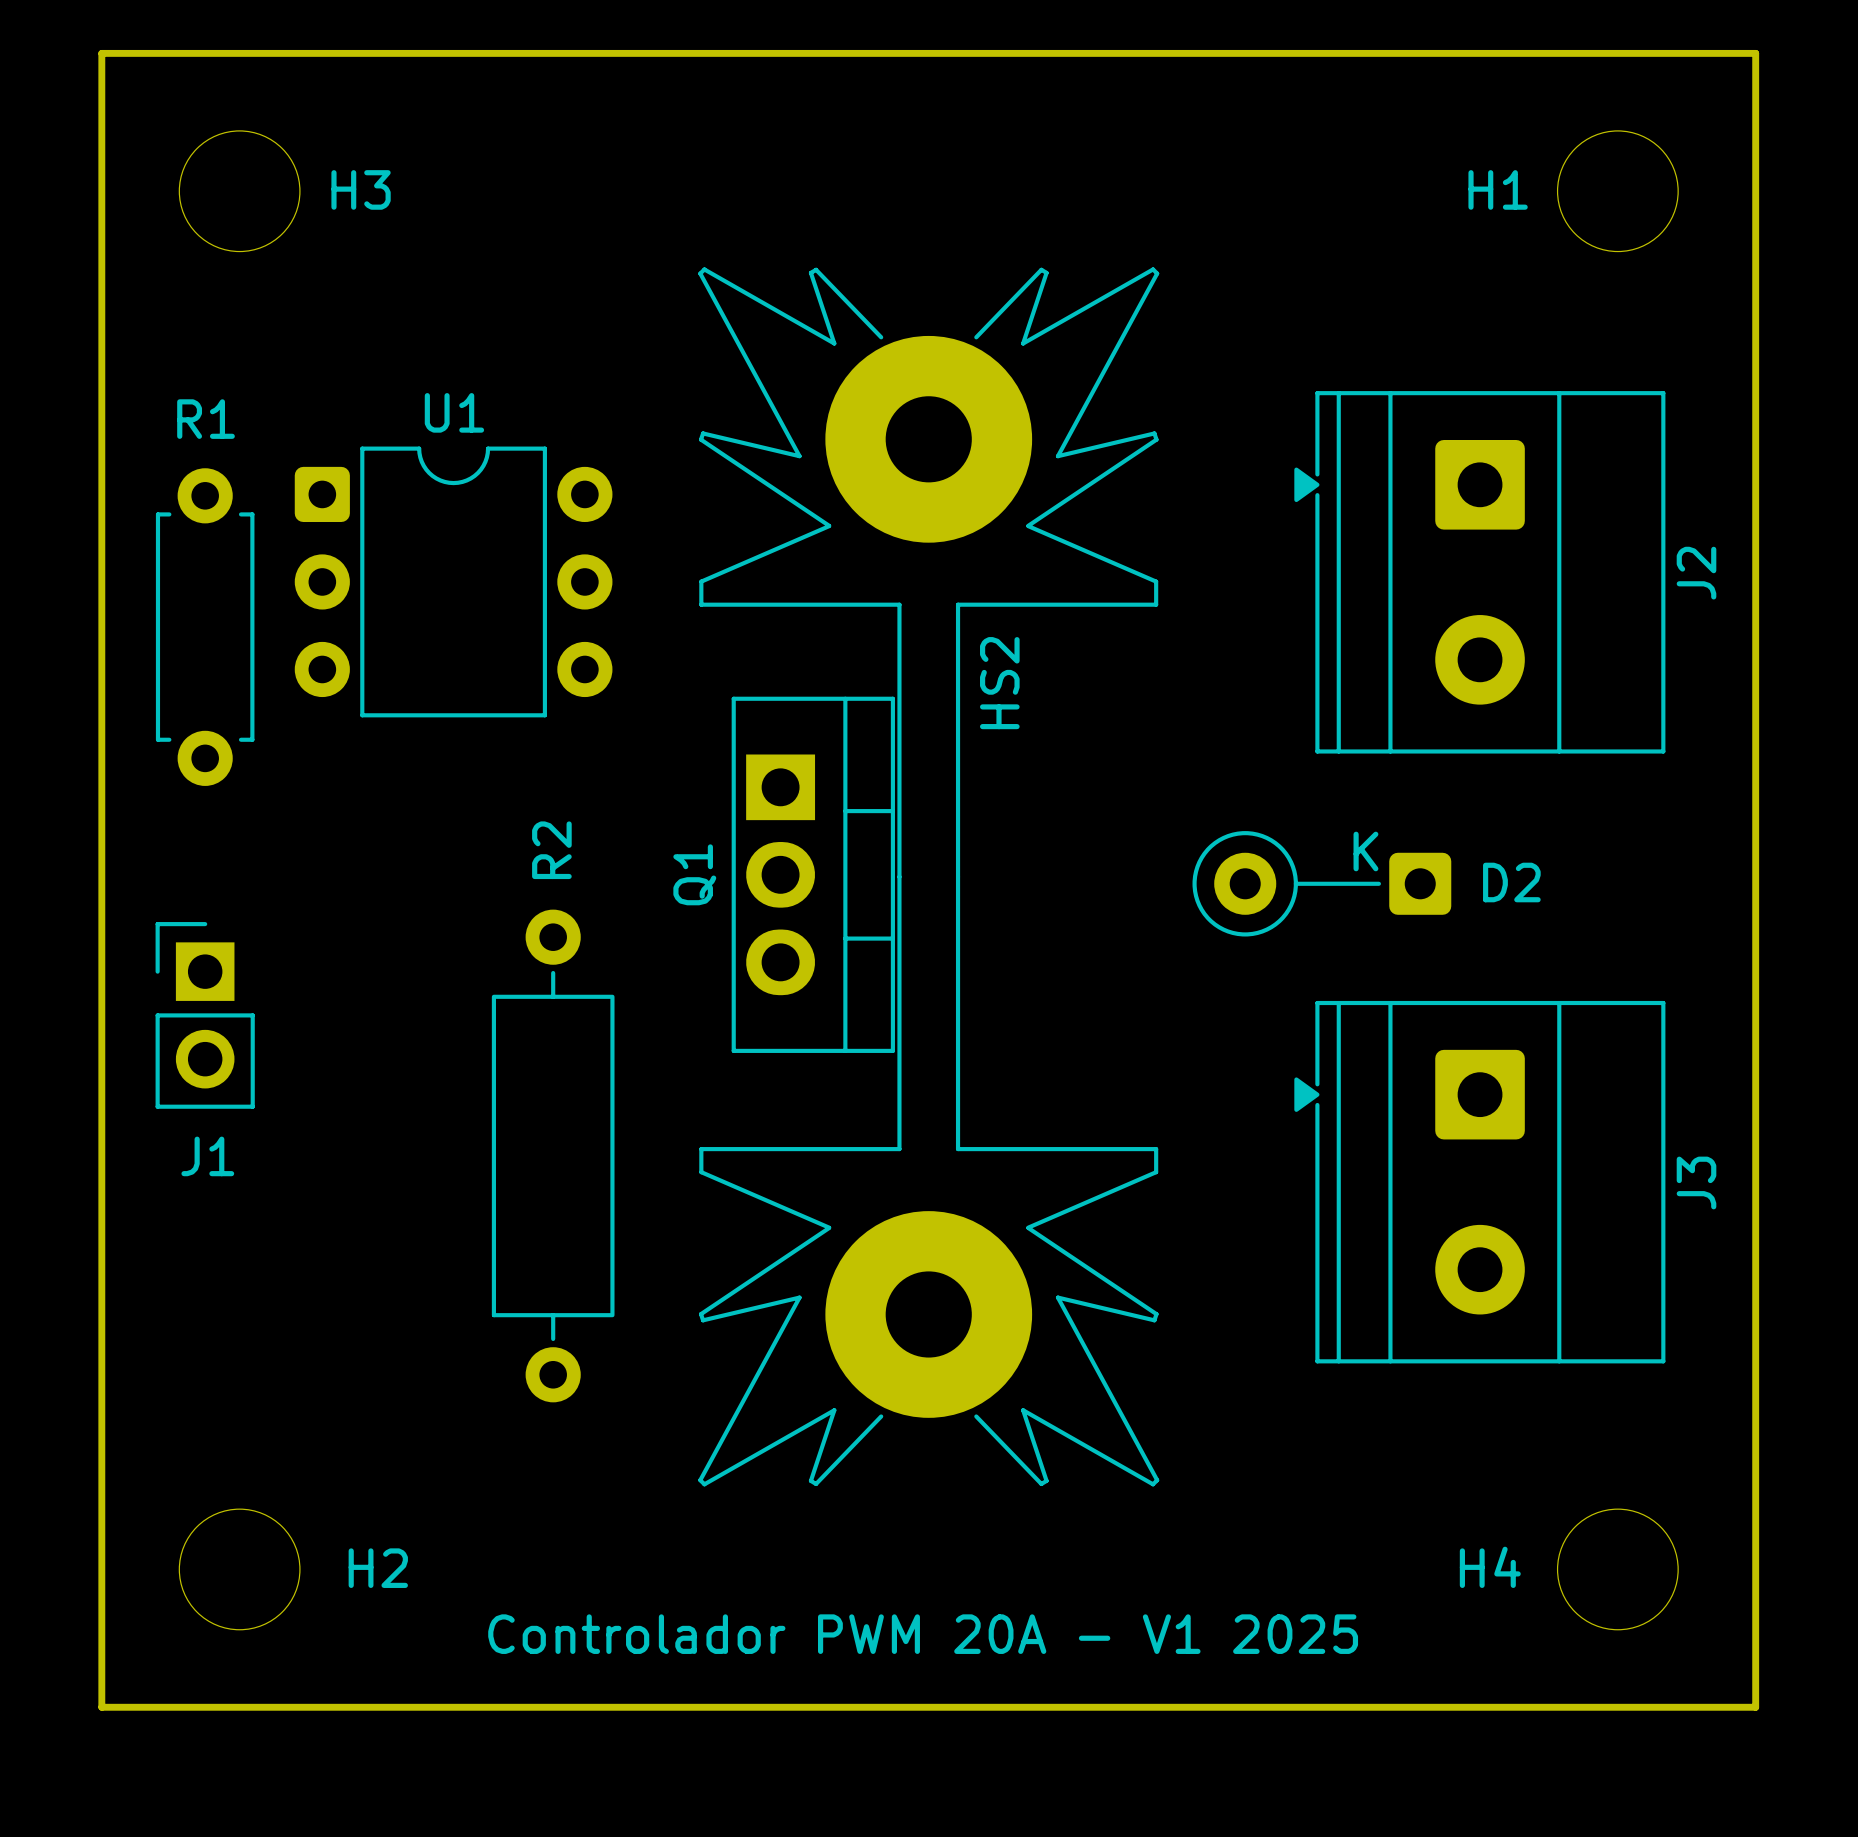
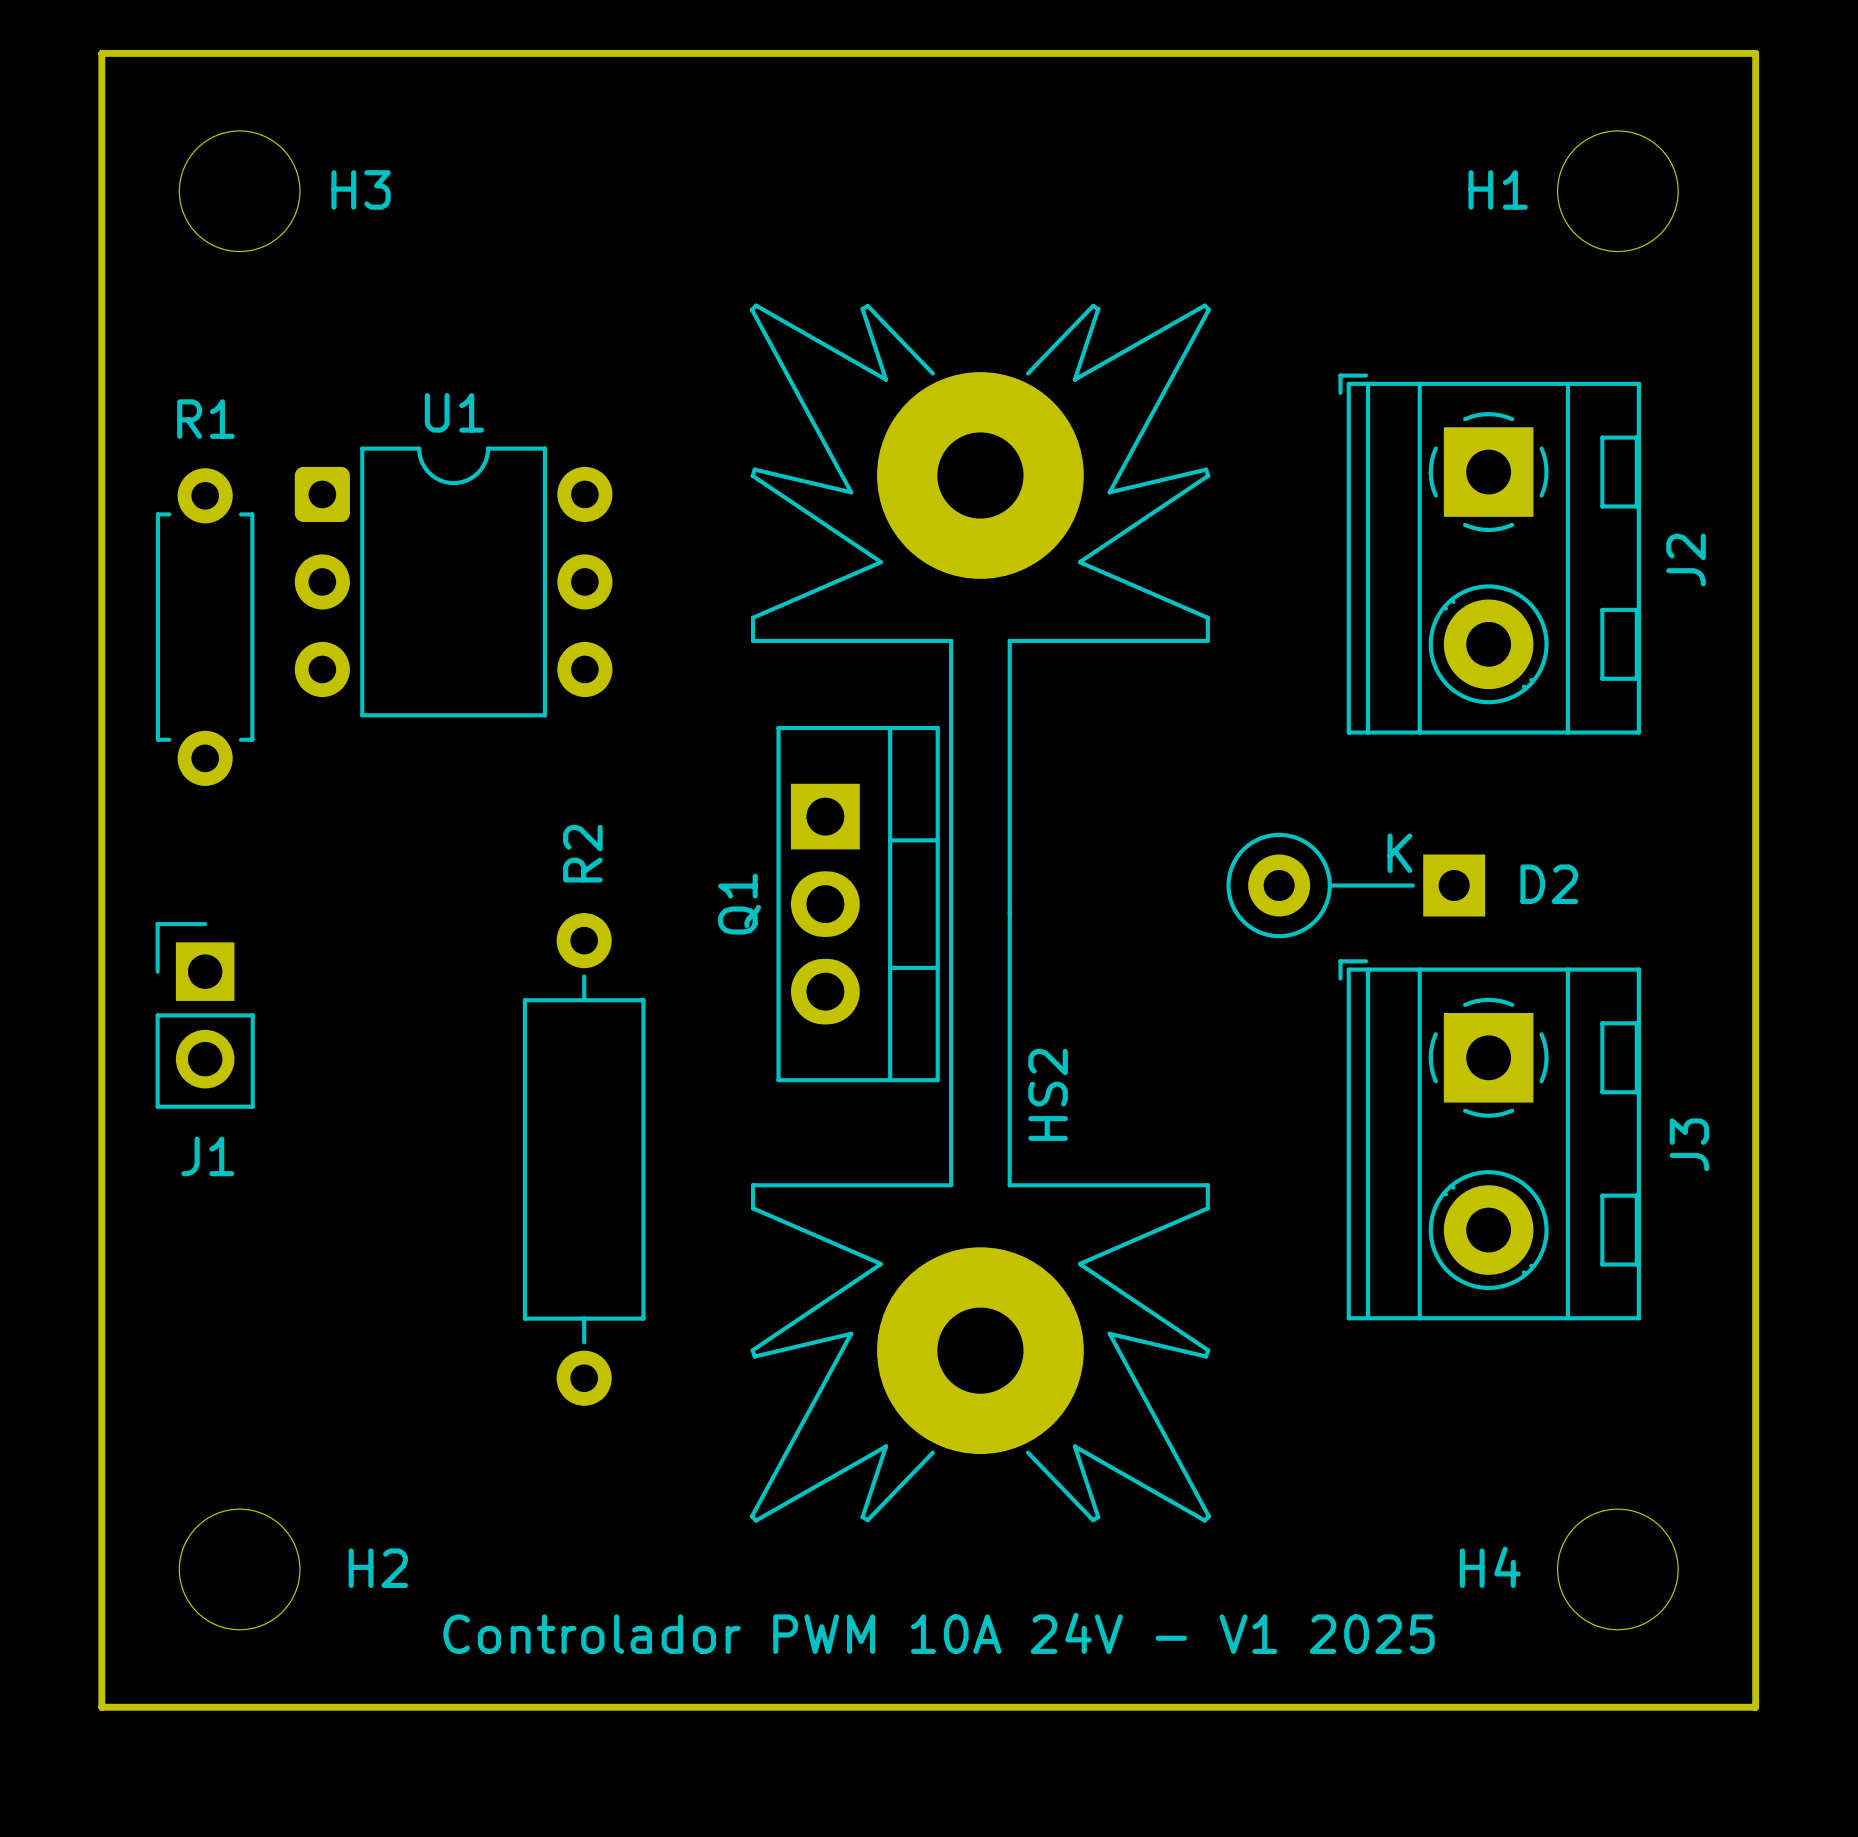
J2 footprint: [1294, 391, 1666, 754] -> [1338, 373, 1641, 735]
HS2 name position: HS2 (999, 683) -> HS2 (1048, 1094)
D2 footprint: [1192, 831, 1452, 937] -> [1226, 832, 1486, 939]
Q1 position: (813, 874) -> (858, 904)
HS2 position: (928, 876) -> (980, 913)
J3 footprint: [1294, 1000, 1666, 1364] -> [1338, 959, 1641, 1321]
R2 position: (553, 1155) -> (584, 1159)
text: Controlador PWM 20A - V1 2025 (923, 1634) -> Controlador PWM 10A 24V - V1 2025 (939, 1633)

